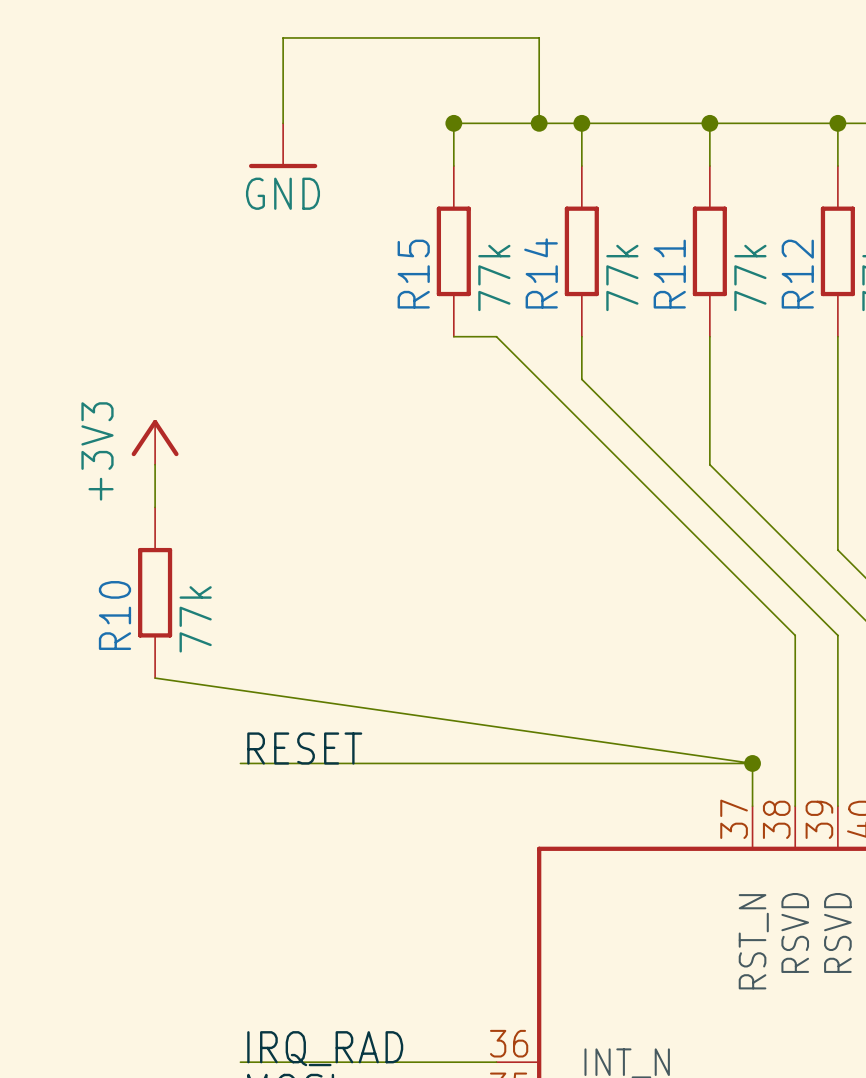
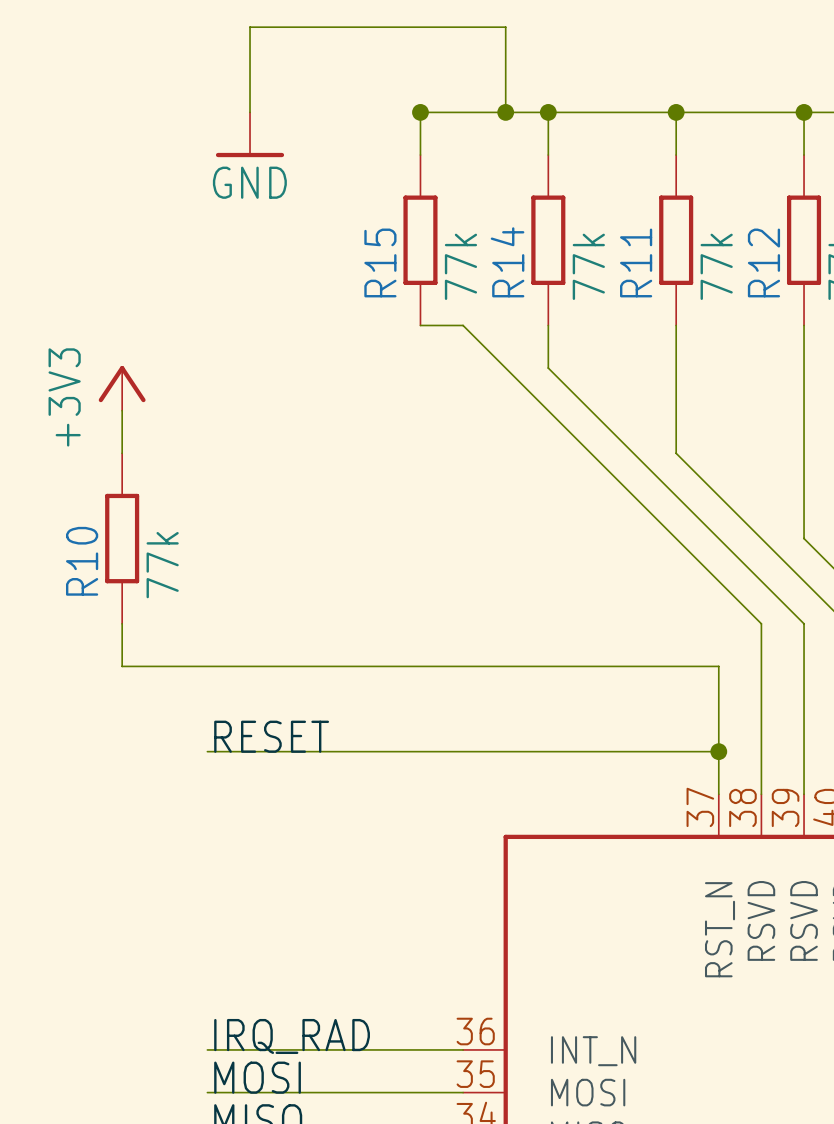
power symbol position: +3V3 (155, 442) -> +3V3 (122, 388)
R10 position: (155, 592) -> (122, 538)
wire: (155, 678) (752, 763) -> (122, 623) (122, 666) (718, 666) (718, 751)

